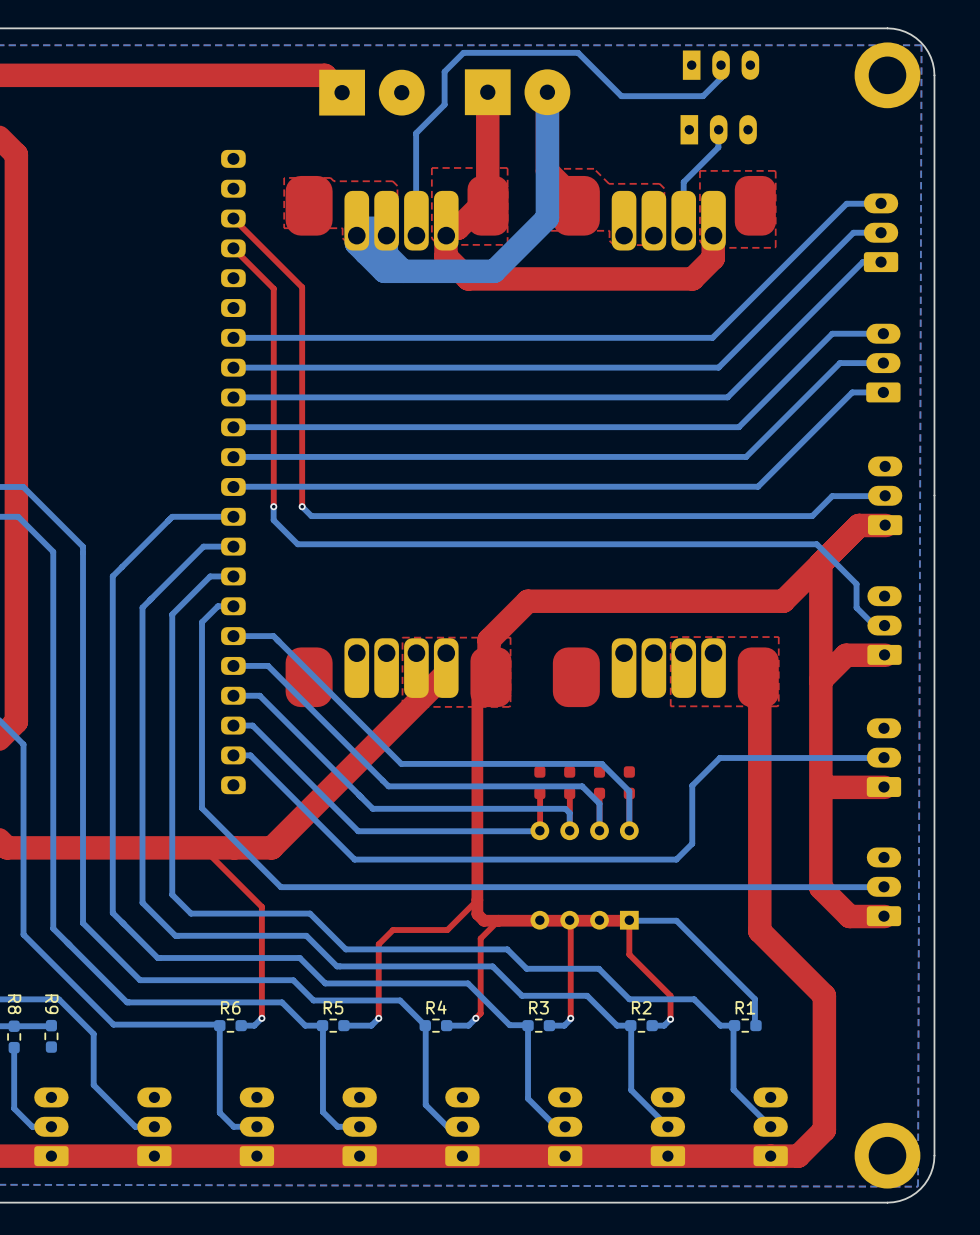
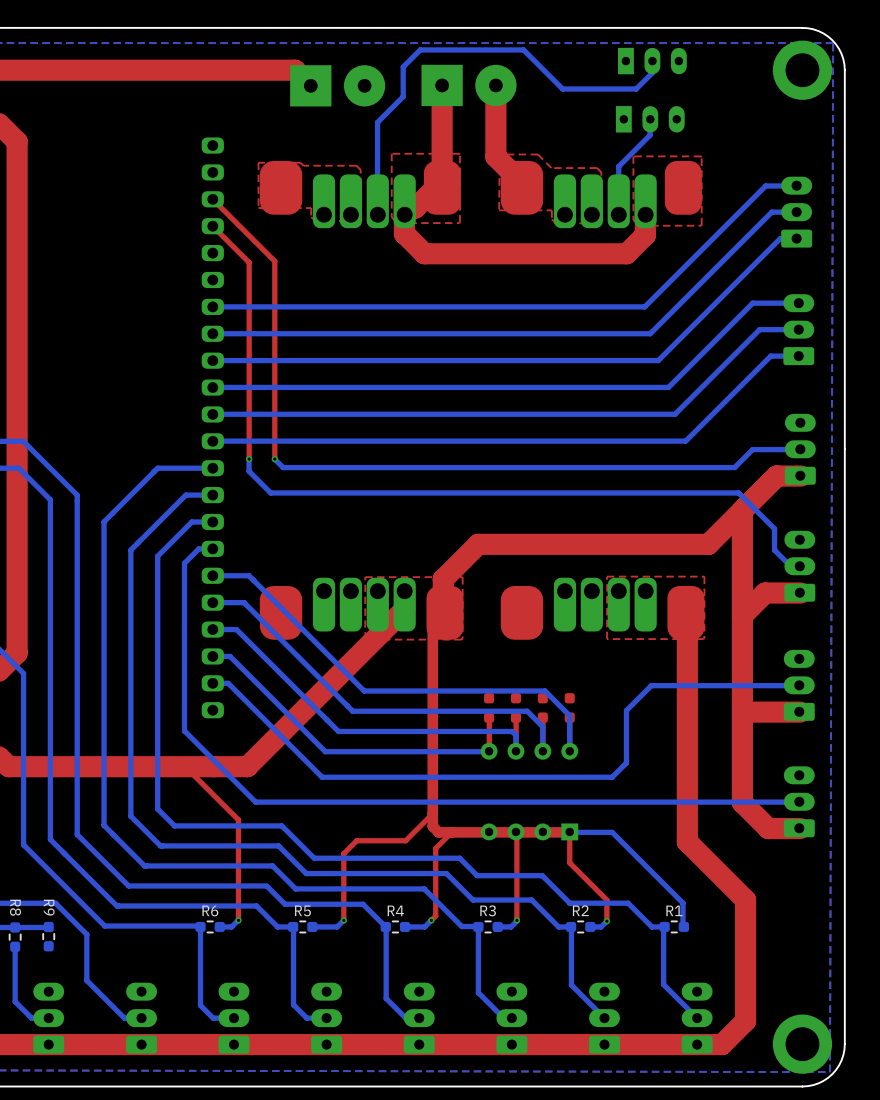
bottom track: (547, 92) (547, 218) (494, 271) (384, 271) (356, 243) (356, 228) (386, 228) (386, 254) (403, 271) -> none

